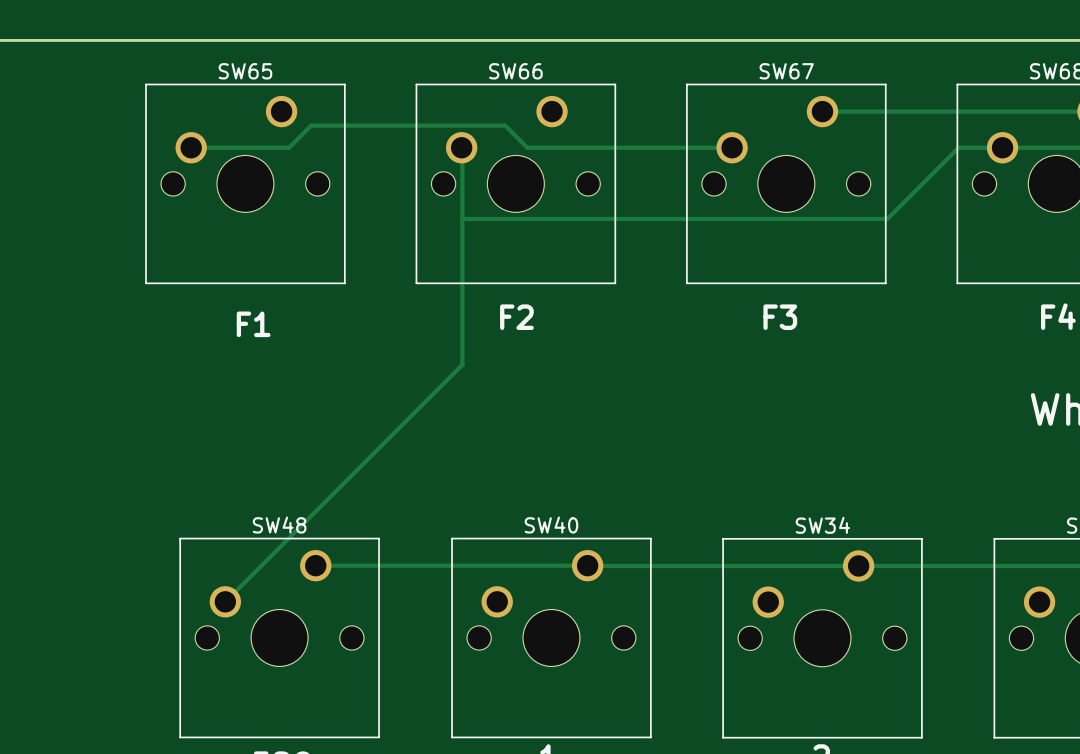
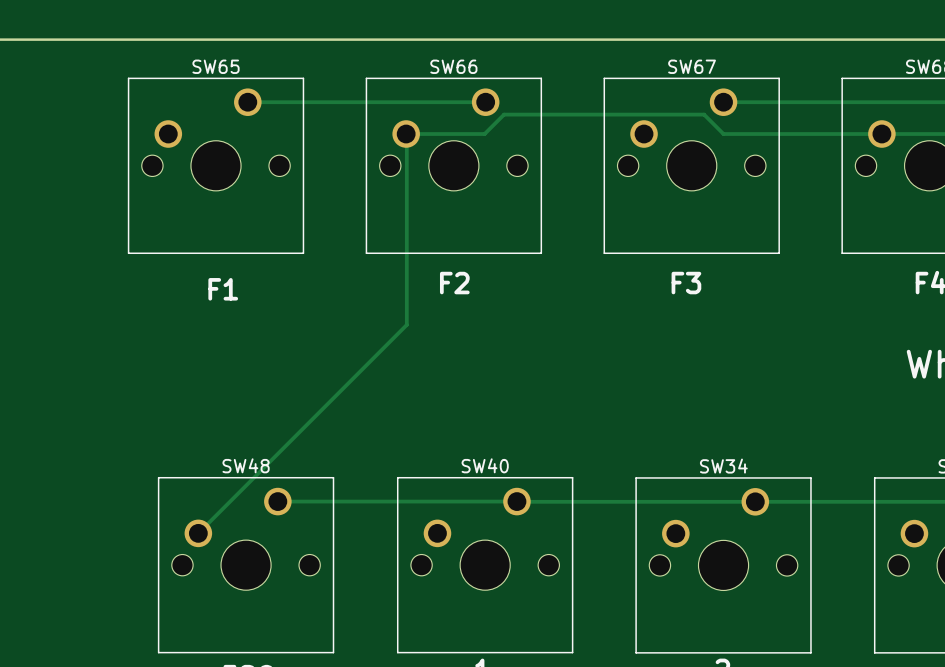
track: none -> (247, 102) (485, 102)
track: (191, 147) (289, 147) (311, 125) (505, 125) (527, 147) -> (406, 134) (463, 134)
track: (550, 147) (732, 147) -> none
track: (958, 147) (887, 218) (462, 218) -> (843, 134) (723, 134) (704, 114) (504, 114) (484, 134)

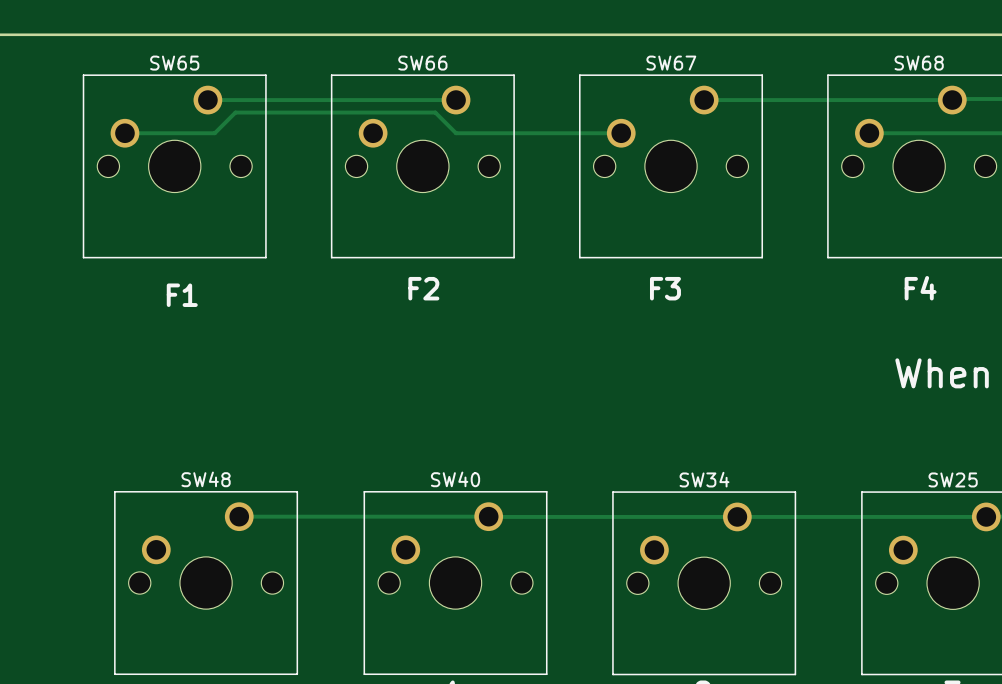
track: none -> (124, 133) (214, 133) (235, 112) (435, 112) (456, 133) (621, 133)
track: (881, 134) (723, 134) (704, 114) (504, 114) (484, 134) (406, 134) (406, 324) (198, 533) -> none

